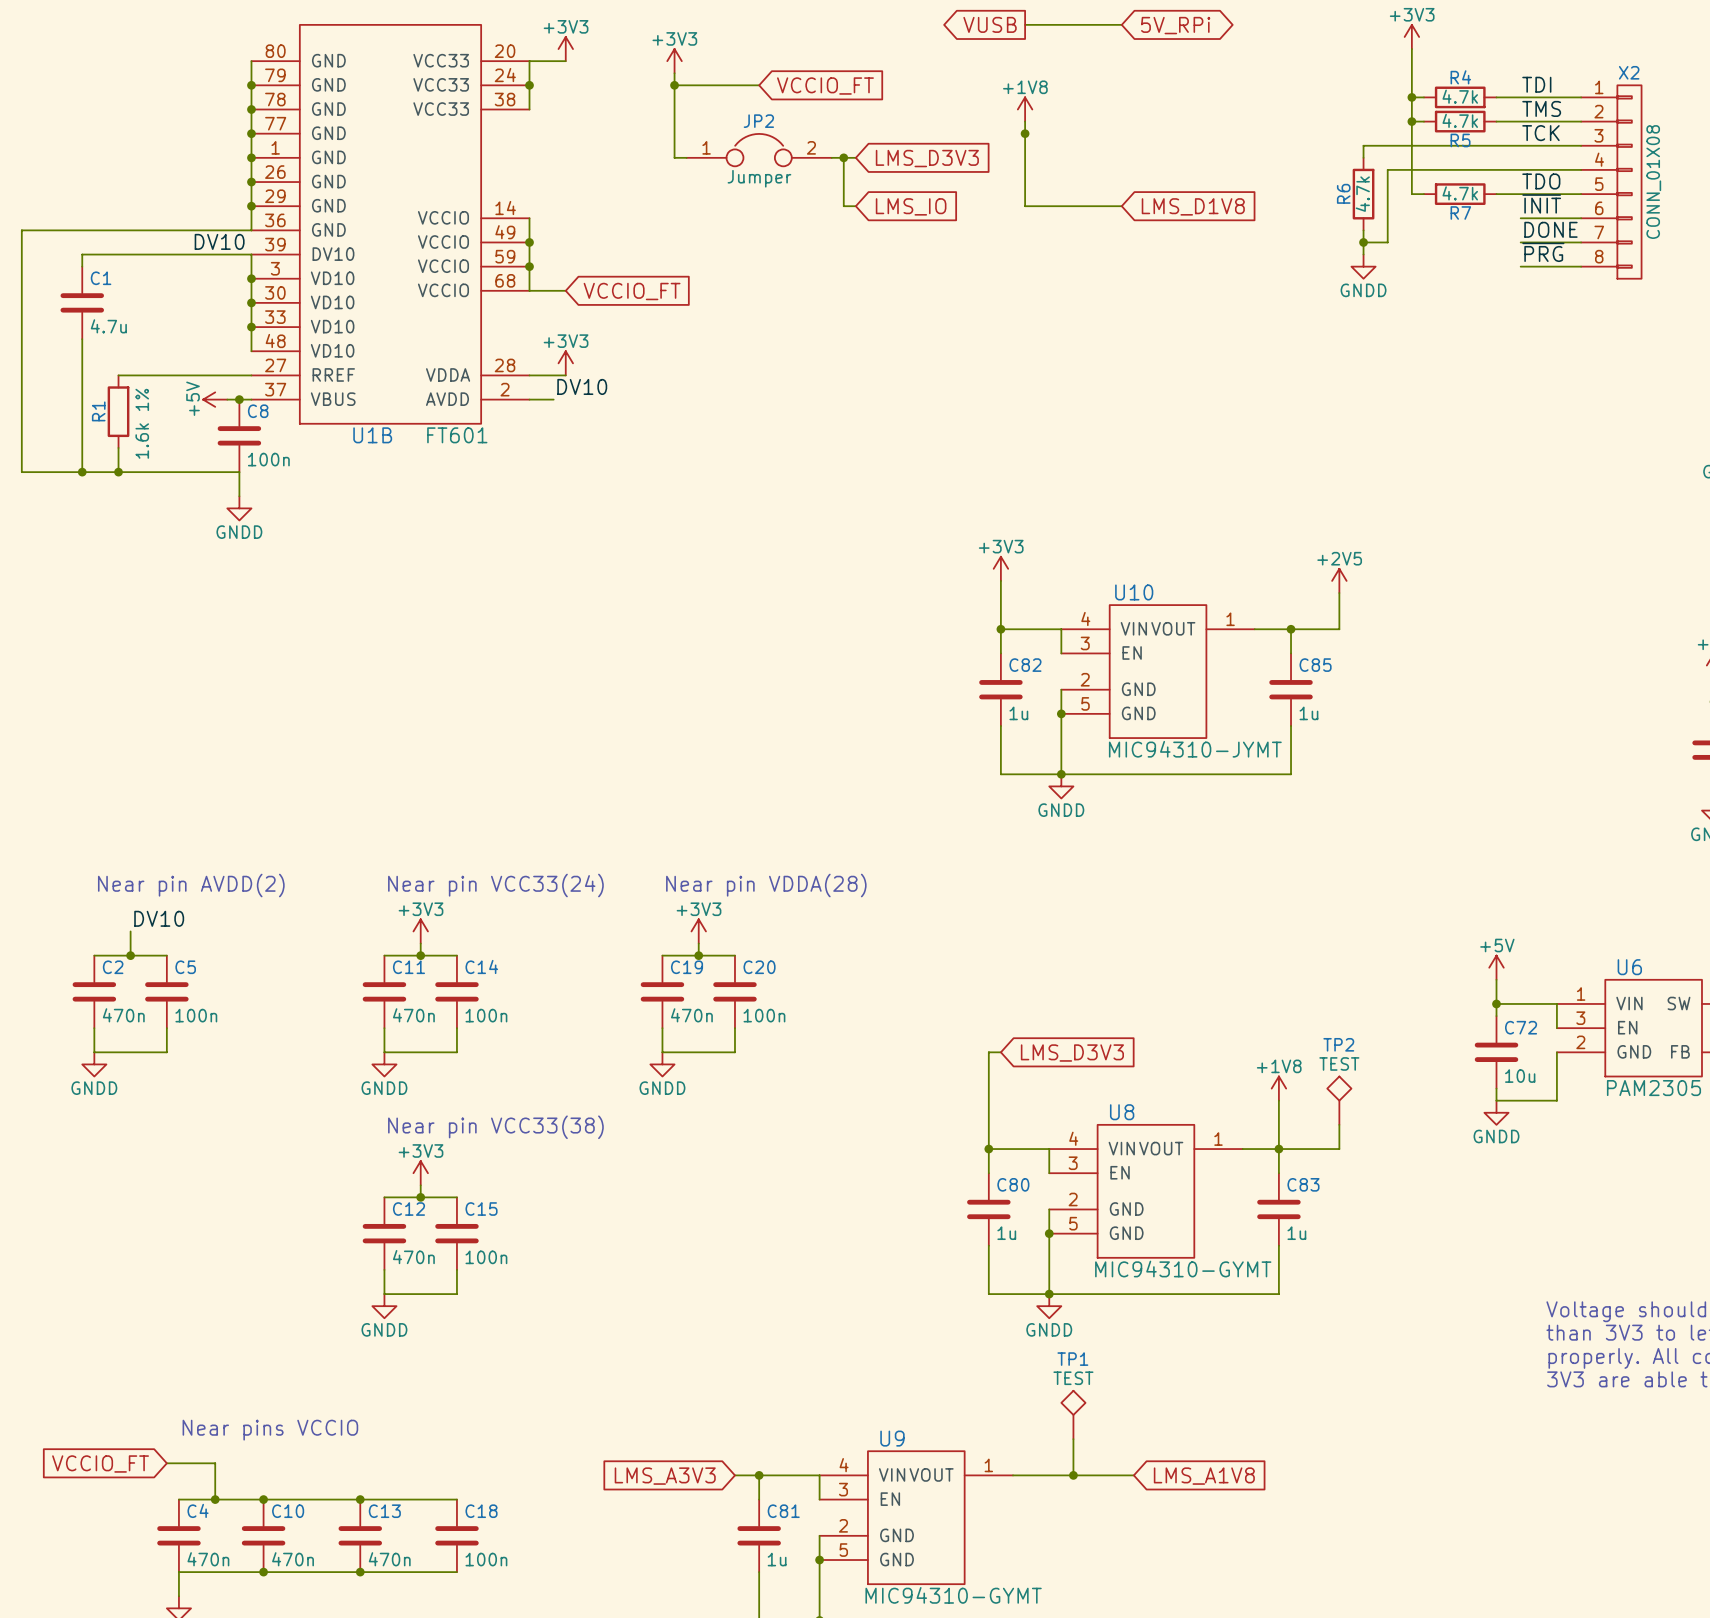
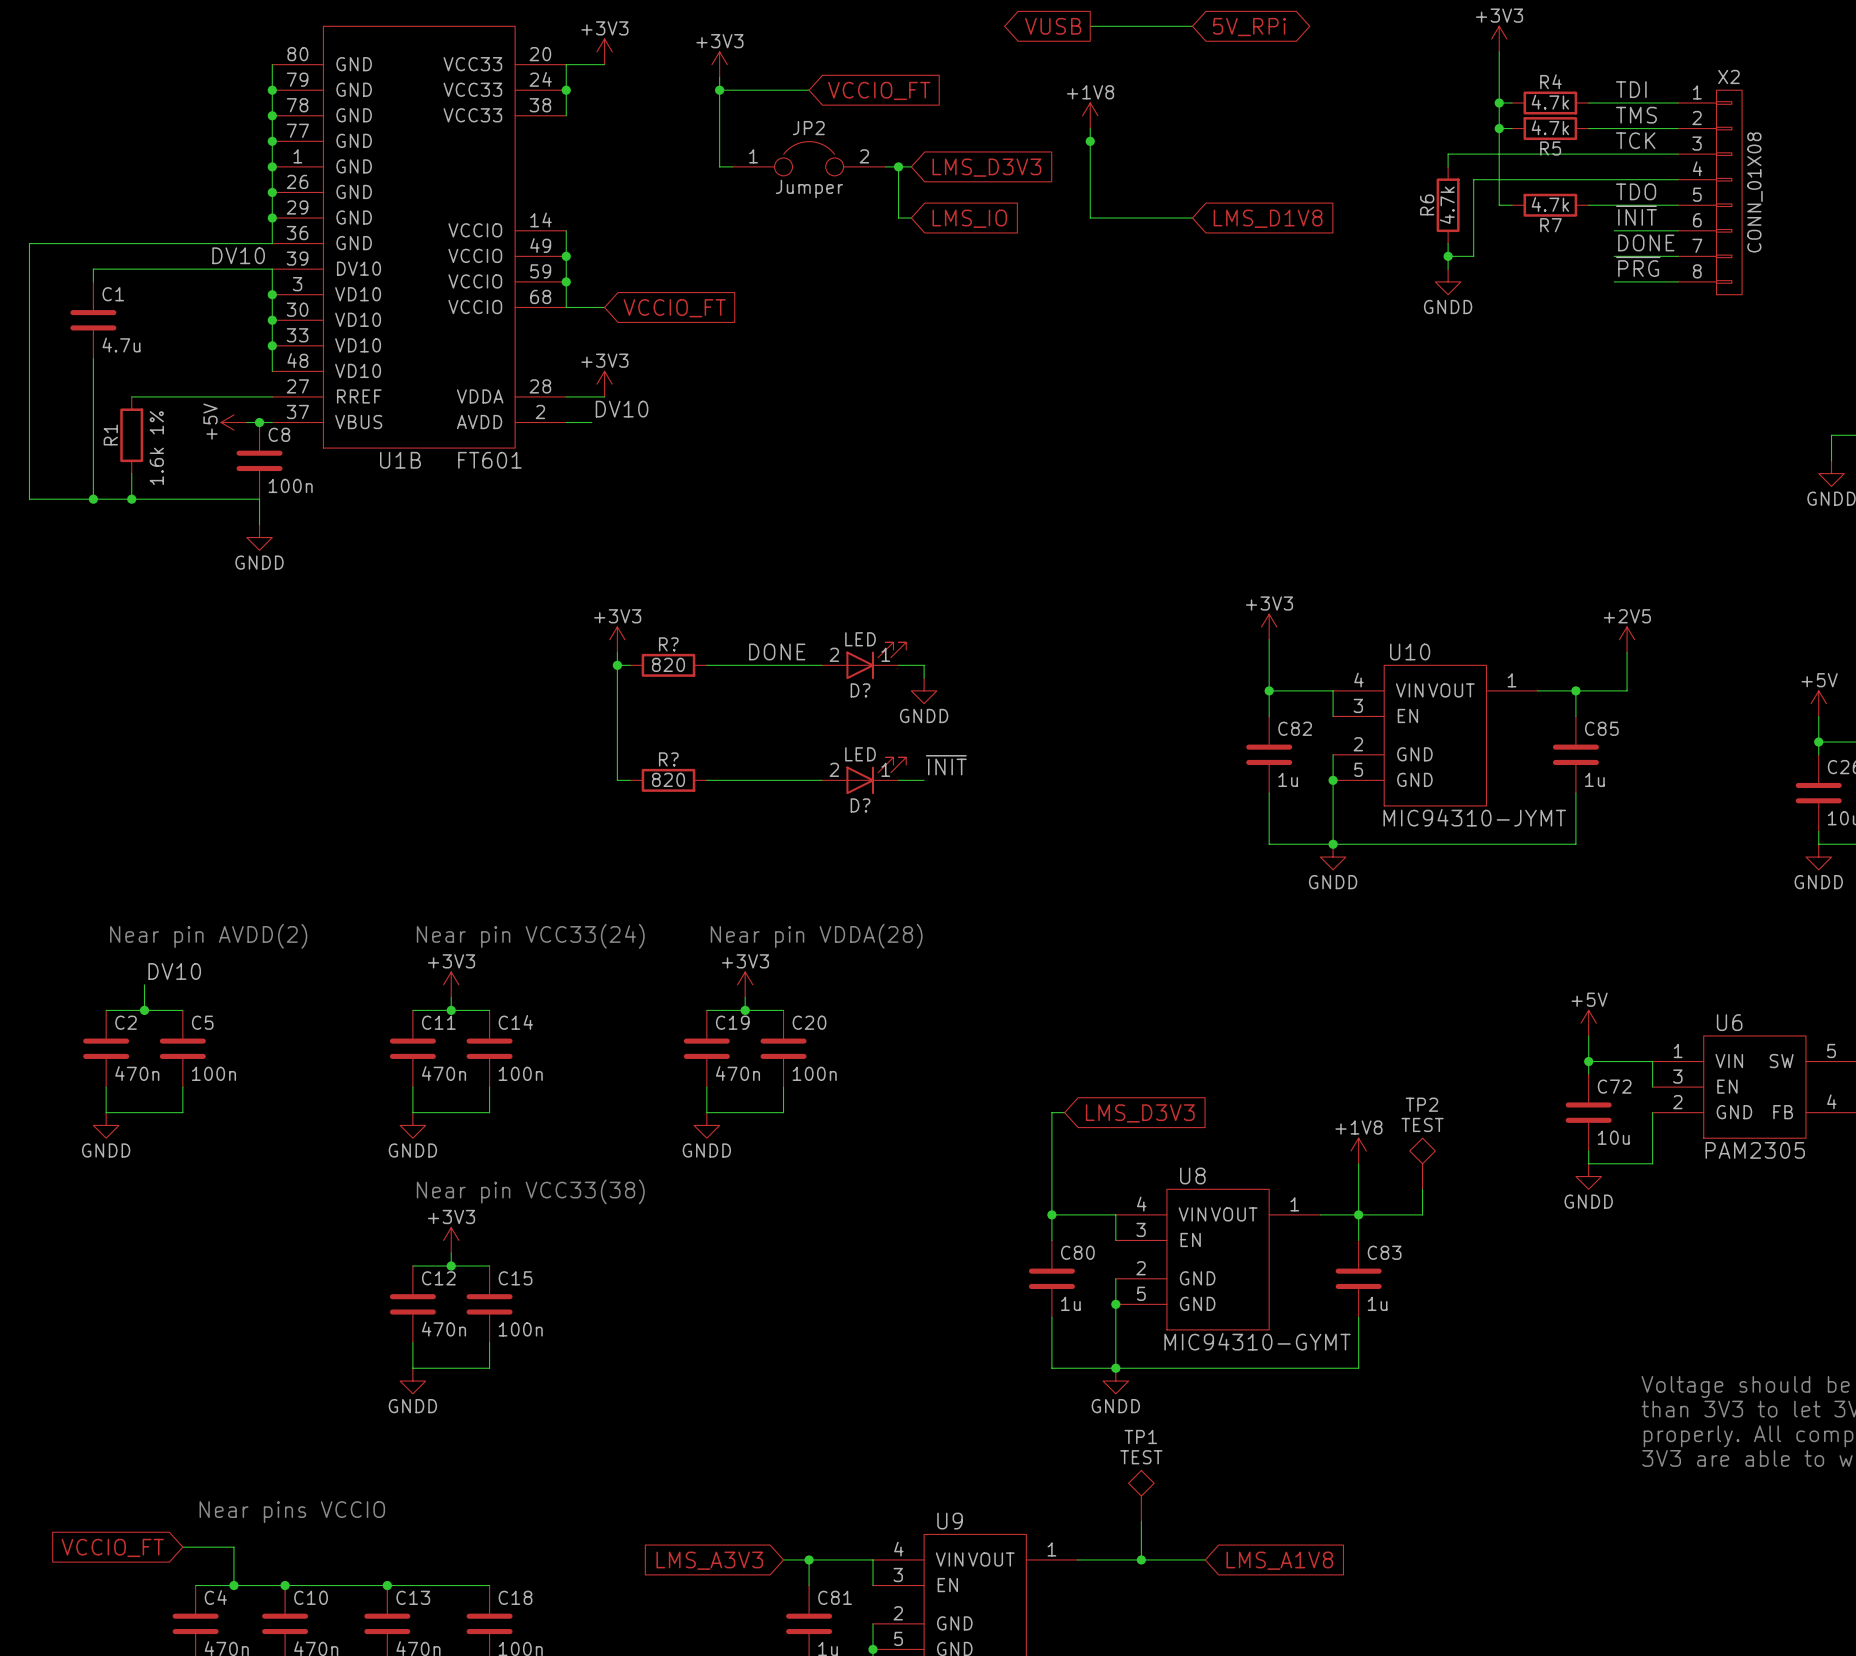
power symbol position: +3V3 (1000, 568) -> +3V3 (1269, 626)
wire: (1000, 580) (1000, 653) -> (1269, 639) (1269, 716)
power symbol position: +2V5 (1339, 580) -> +2V5 (1627, 639)
wire: (1339, 593) (1339, 629) (1254, 629) -> (1627, 652) (1627, 690) (1537, 690)
power symbol: none -> +3V3 (617, 639)
label: none -> DONE (777, 651)
wire: none -> (617, 652) (617, 780) (630, 780)
D?: none -> LED (864, 660)
wire: none -> (617, 665) (630, 665)
junction: none -> (617, 665)
R?: none -> 820 (668, 665)
wire: none -> (706, 665) (821, 665)
wire: none -> (898, 665) (924, 665) (924, 678)
wire: (1000, 629) (1061, 629) (1061, 653) -> (1269, 690) (1333, 690) (1333, 716)
junction: (1000, 629) -> none
wire: (1291, 629) (1291, 653) -> (1575, 690) (1575, 716)
junction: (1291, 629) -> none
power symbol: none -> GNDD (924, 690)
junction: none -> (1269, 690)
junction: none -> (1575, 690)
U10 position: (1158, 671) -> (1435, 735)
C82 position: (1000, 689) -> (1269, 754)
wire: (1061, 689) (1061, 774) -> (1333, 754) (1333, 844)
C85 position: (1291, 689) -> (1575, 754)
junction: (1061, 713) -> none
label: none -> ~{INIT} (946, 765)
wire: (1000, 725) (1000, 774) (1291, 774) (1291, 725) -> (1269, 793) (1269, 844) (1575, 844) (1575, 793)
D?: none -> LED (864, 775)
R?: none -> 820 (668, 780)
wire: none -> (706, 780) (821, 780)
wire: none -> (898, 780) (924, 780)
junction: none -> (1333, 780)
junction: (1061, 774) -> none
power symbol: GNDD (1061, 786) -> none
junction: none -> (1333, 844)
power symbol: none -> GNDD (1333, 857)

